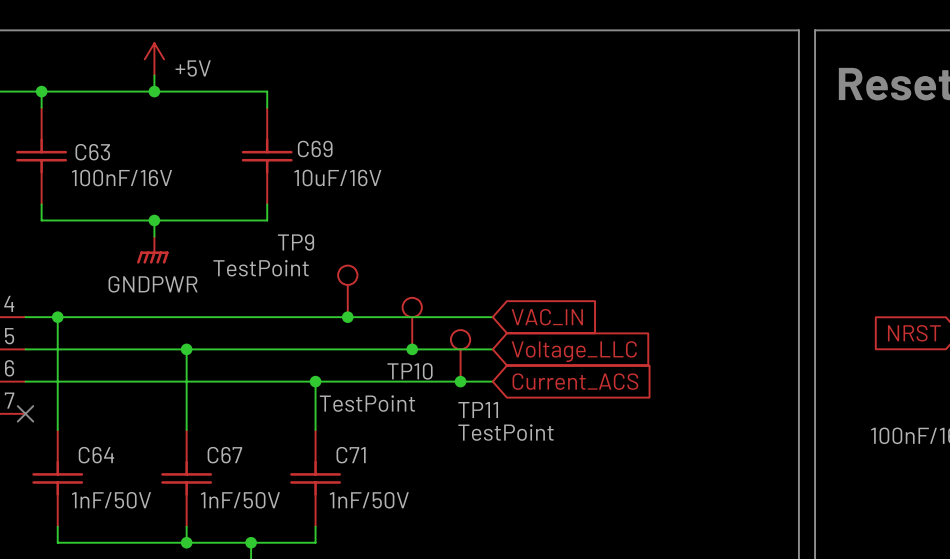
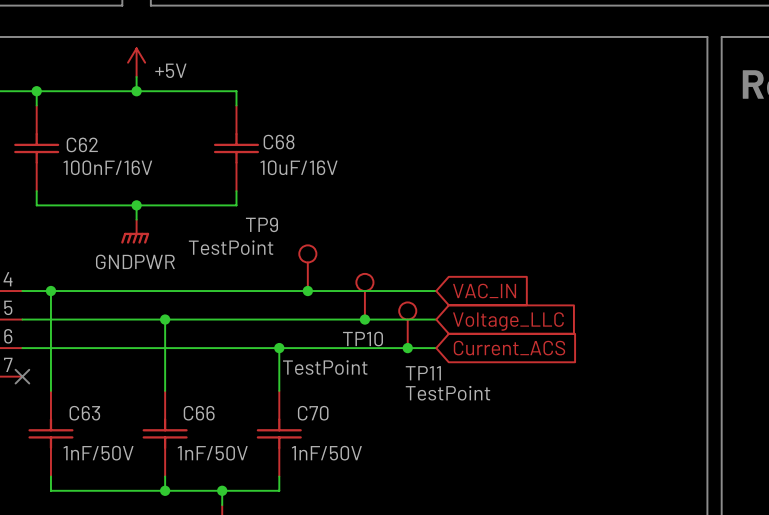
C69 name: C69 (315, 148) -> C68 (279, 142)
C63 name: C63 (92, 152) -> C62 (82, 144)
C64 name: C64 (96, 455) -> C63 (84, 413)
C67 name: C67 (224, 455) -> C66 (199, 413)
C71 name: C71 (351, 455) -> C70 (313, 413)

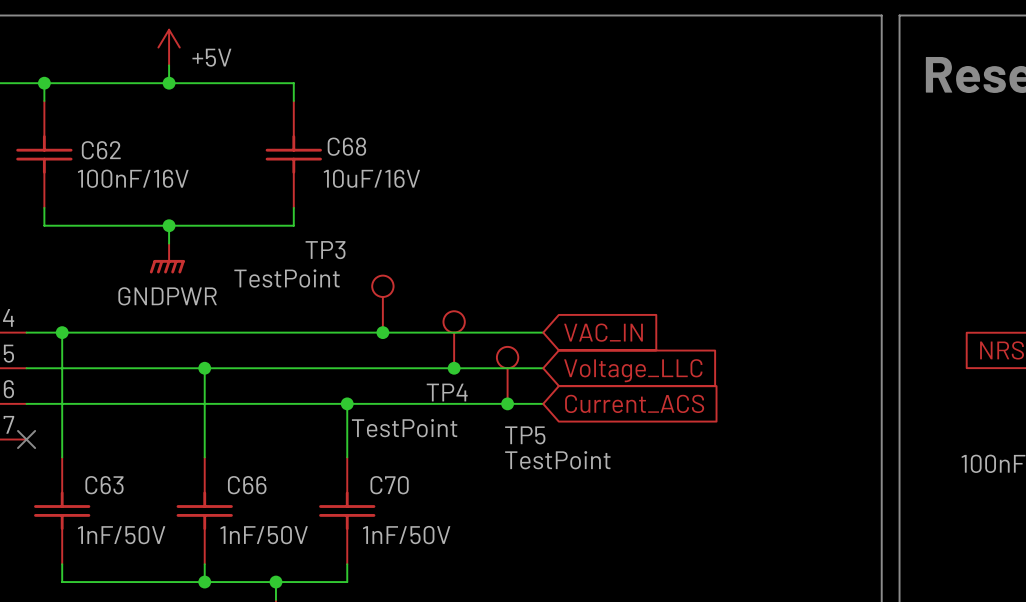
TP9 name: TP9 (261, 224) -> TP3 (325, 250)
TP10 name: TP10 (362, 339) -> TP4 (447, 392)
TP11 name: TP11 (423, 373) -> TP5 (525, 435)

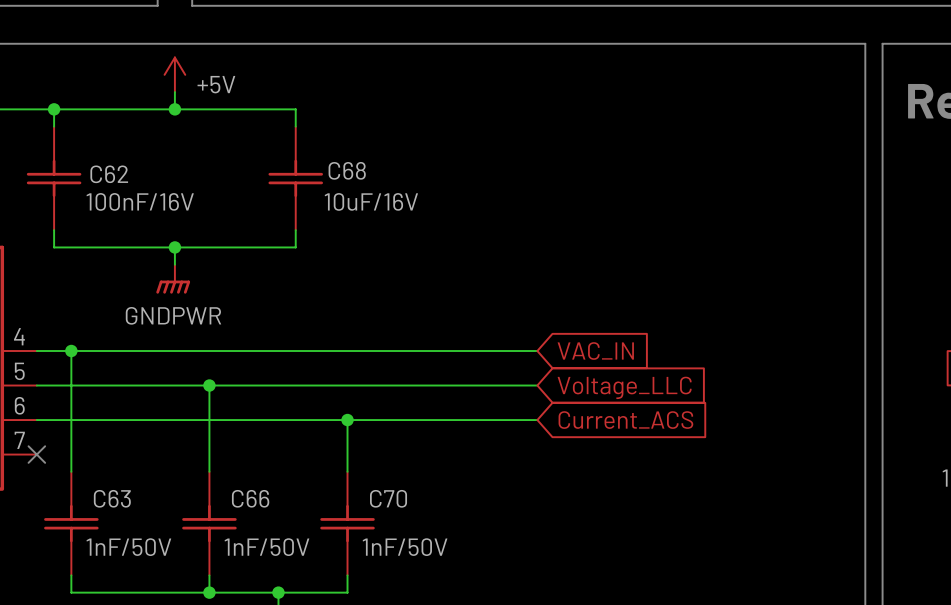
TP3: TestPoint (382, 304) -> none
junction: (382, 332) -> none
TP4: TestPoint (454, 339) -> none
junction: (454, 368) -> none
TP5: TestPoint (507, 375) -> none
junction: (507, 403) -> none

